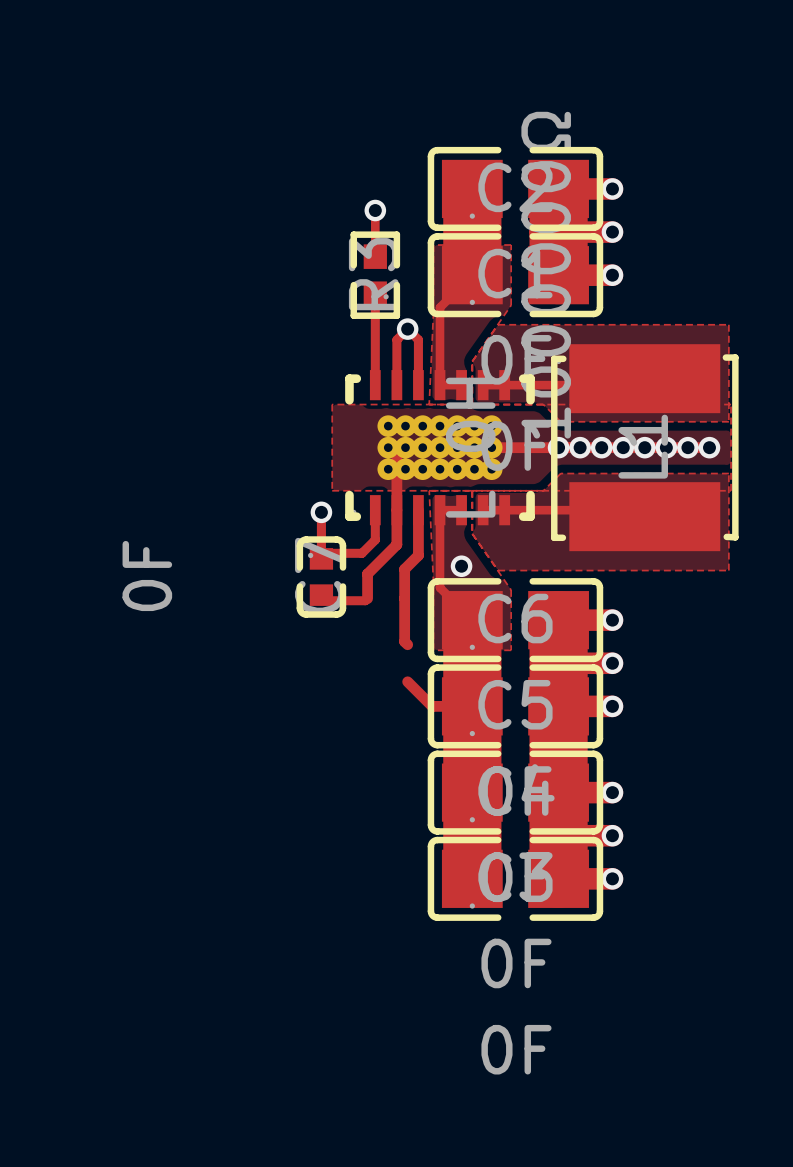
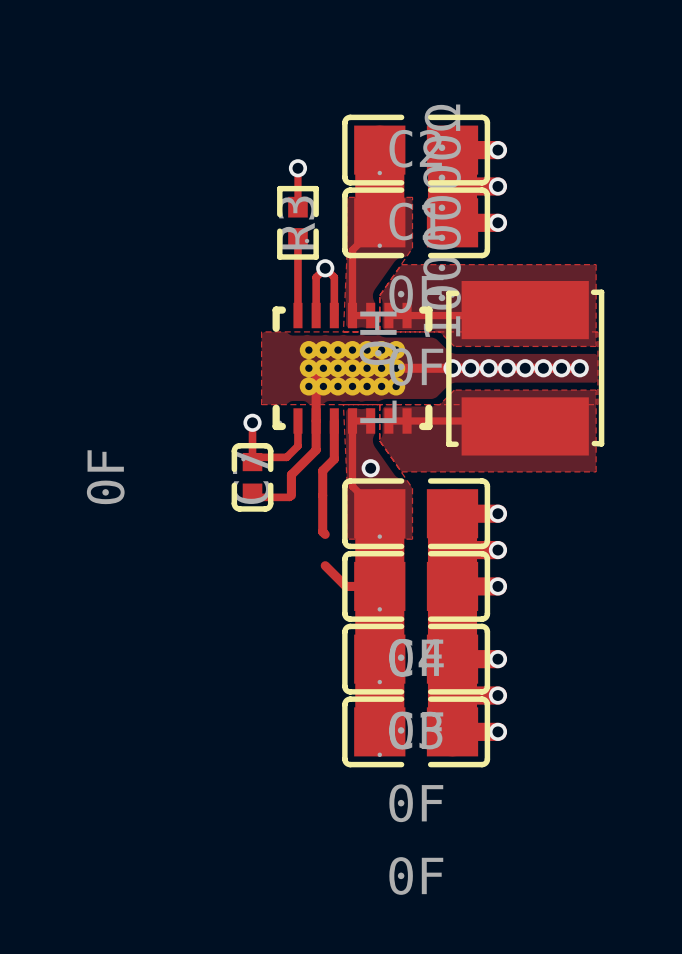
L1 name: L1 (643, 446) -> none
C6 name: C6 (515, 618) -> none
C5 name: C5 (515, 704) -> none

